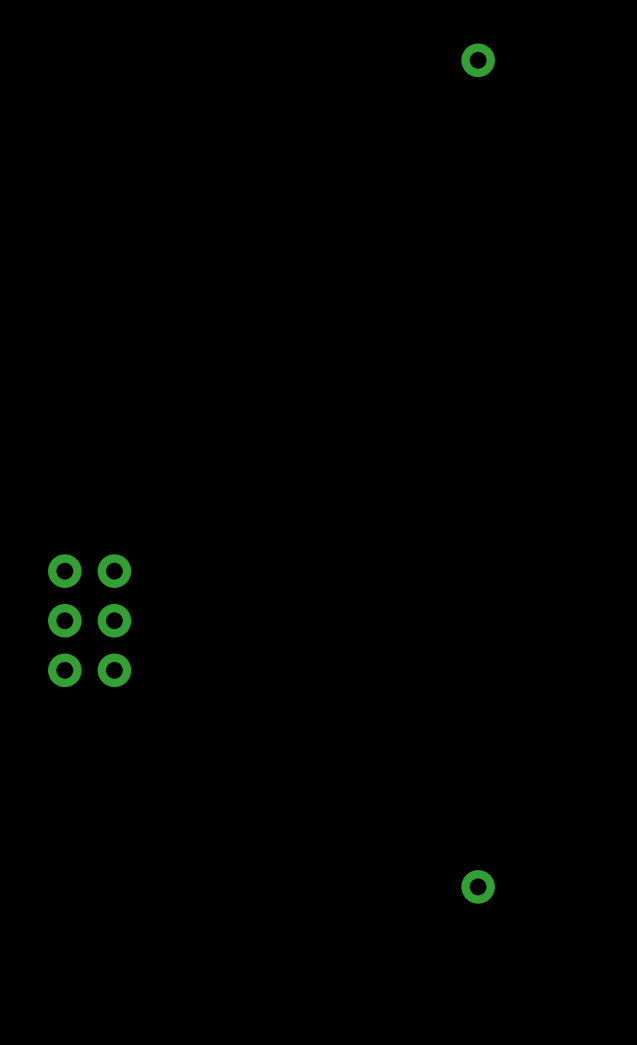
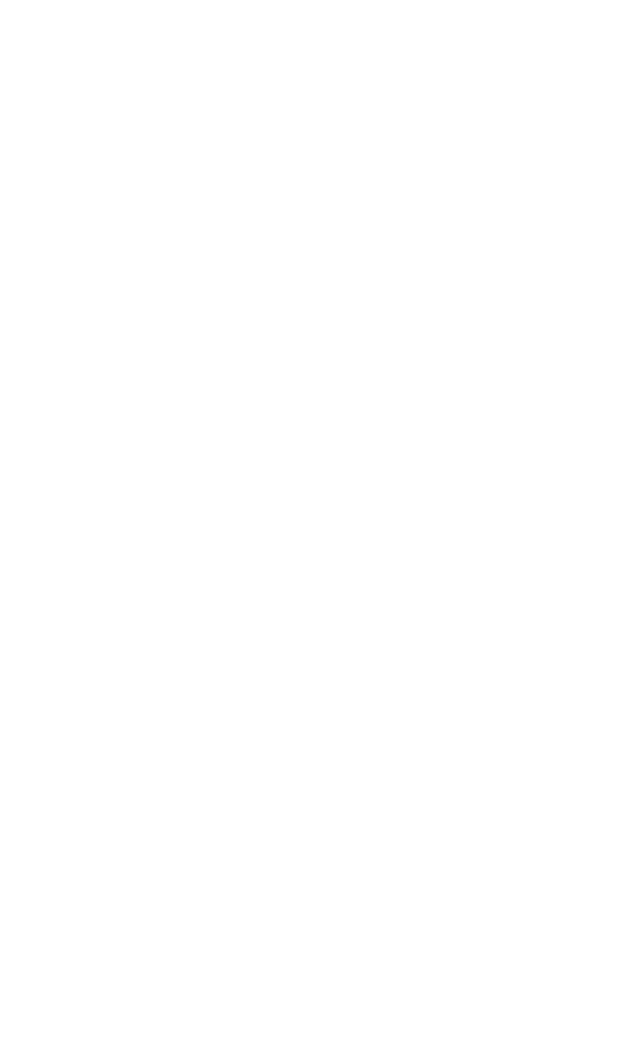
via: (478, 60) -> none
via: (64, 571) -> none
via: (114, 571) -> none
via: (64, 620) -> none
via: (114, 620) -> none
via: (64, 670) -> none
via: (114, 670) -> none
via: (478, 886) -> none

